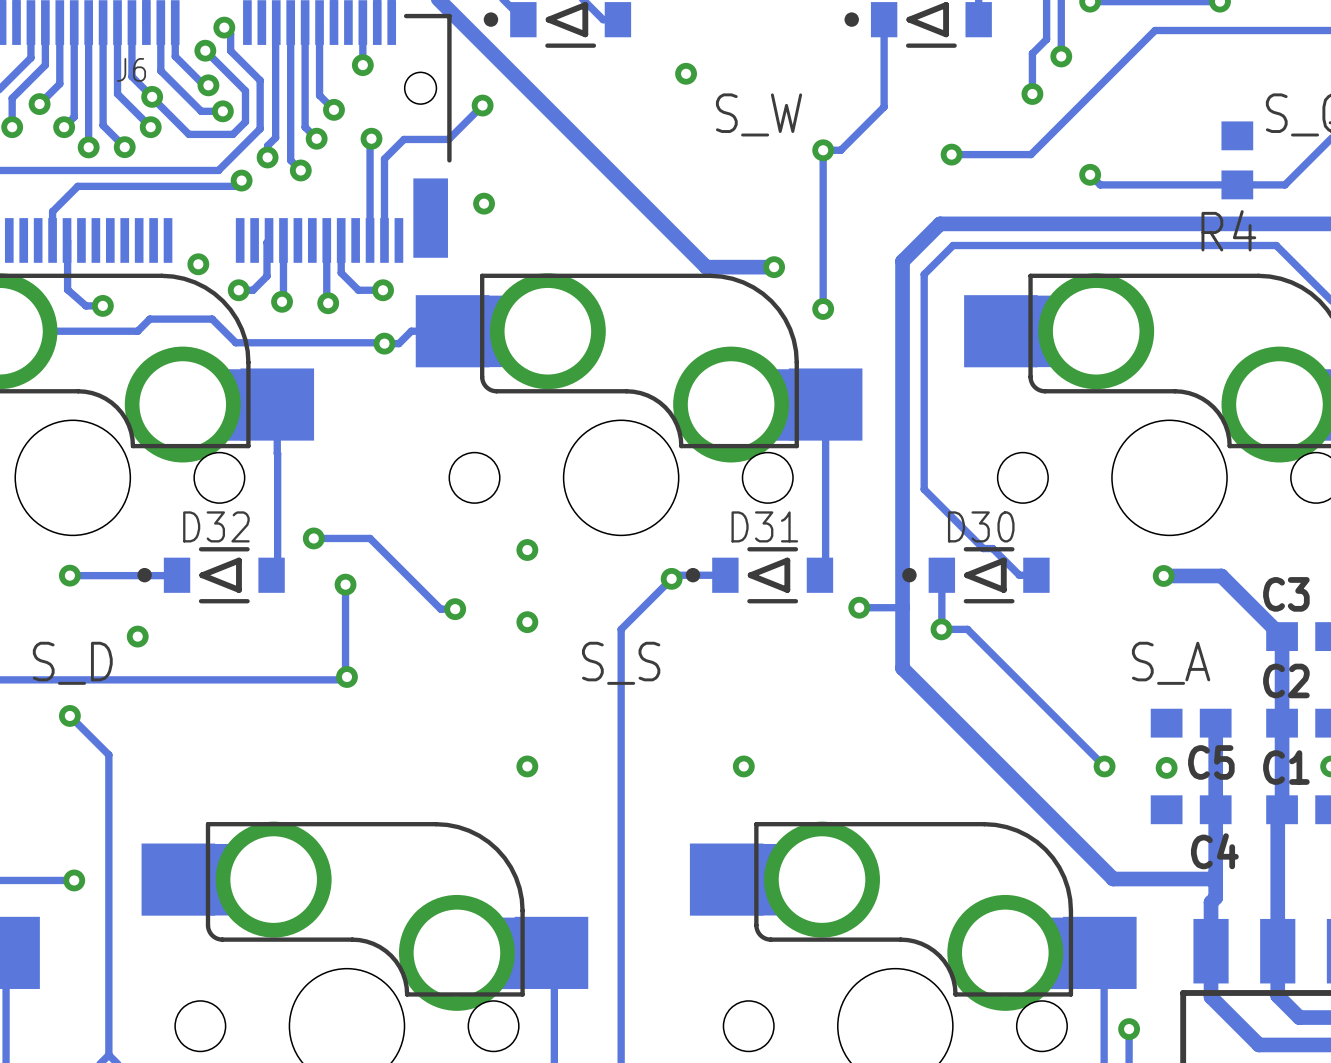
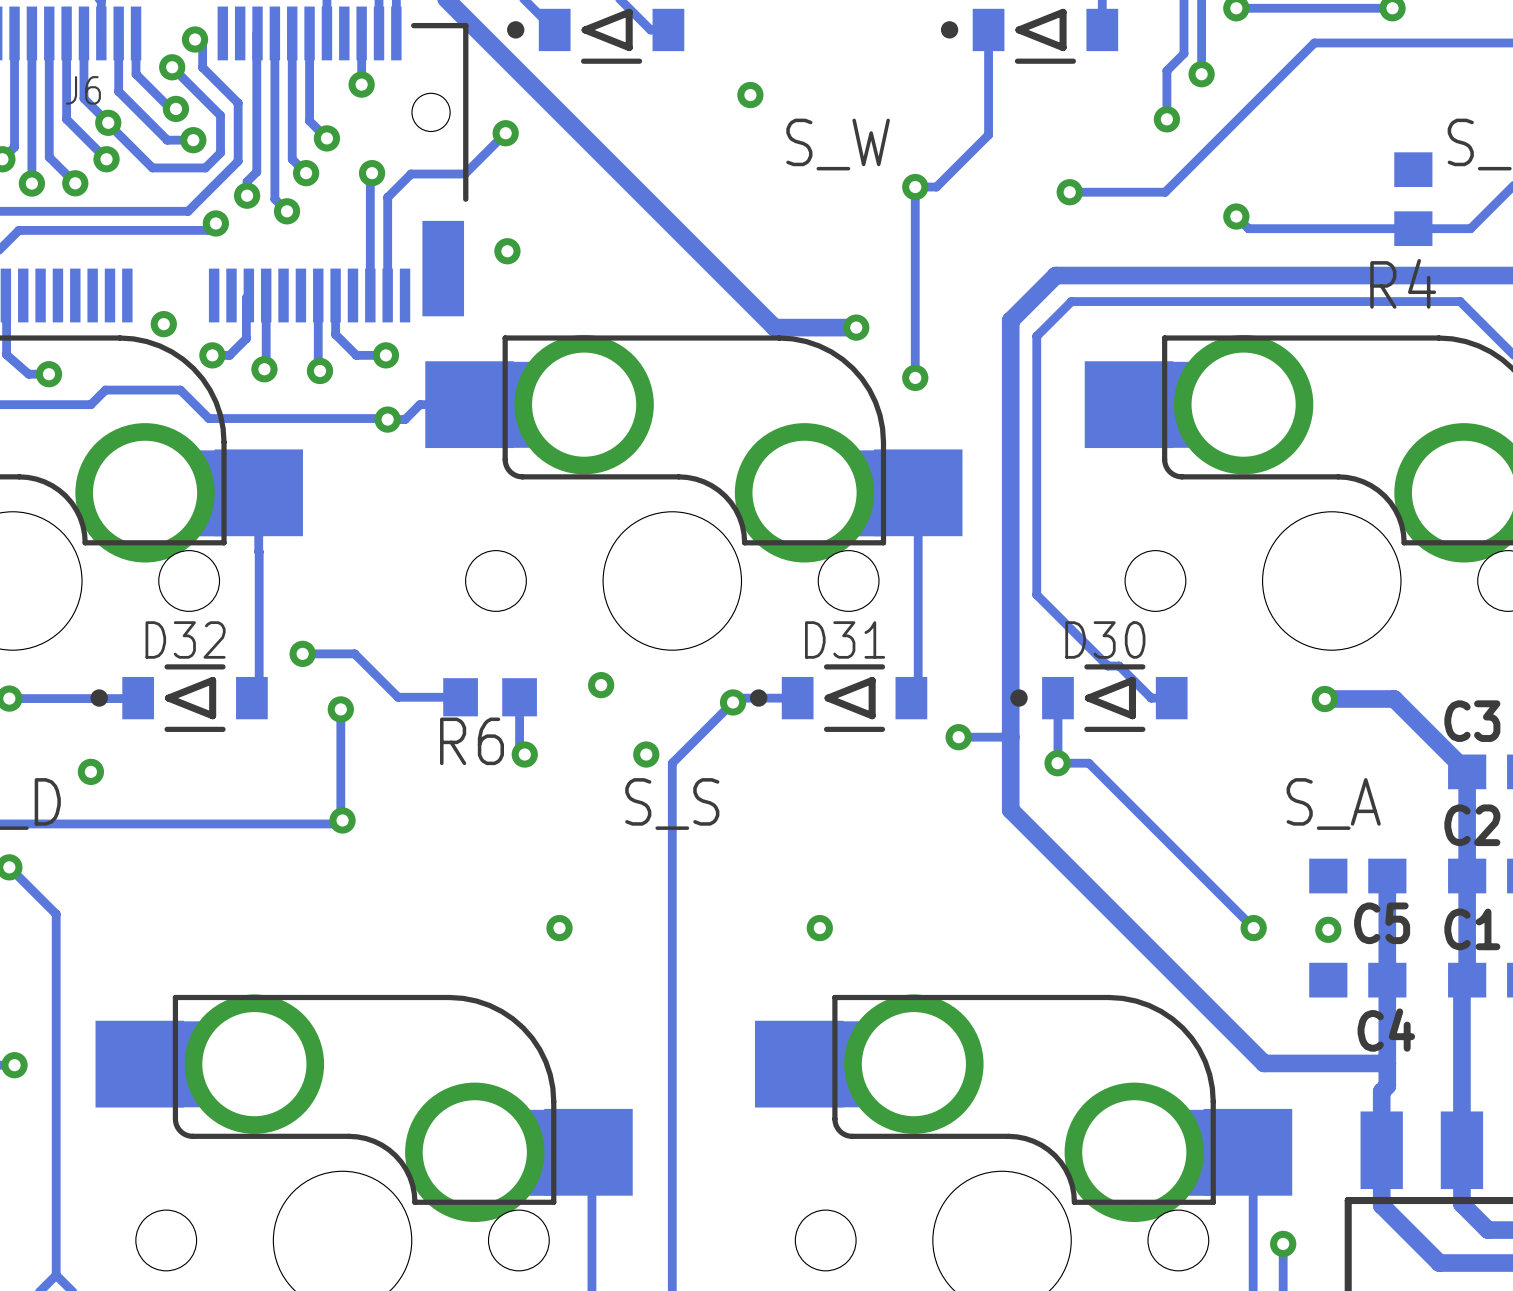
track: (357, 538) (370, 538) (440, 609) (455, 609) -> (354, 653) (398, 697) (460, 697)
via: (527, 550) -> none
via: none -> (601, 685)
R6: none -> (490, 697)
track: none -> (519, 697) (519, 749) (524, 754)
via: (455, 609) -> none
via: none -> (524, 754)
via: (527, 622) -> none
via: none -> (646, 754)

